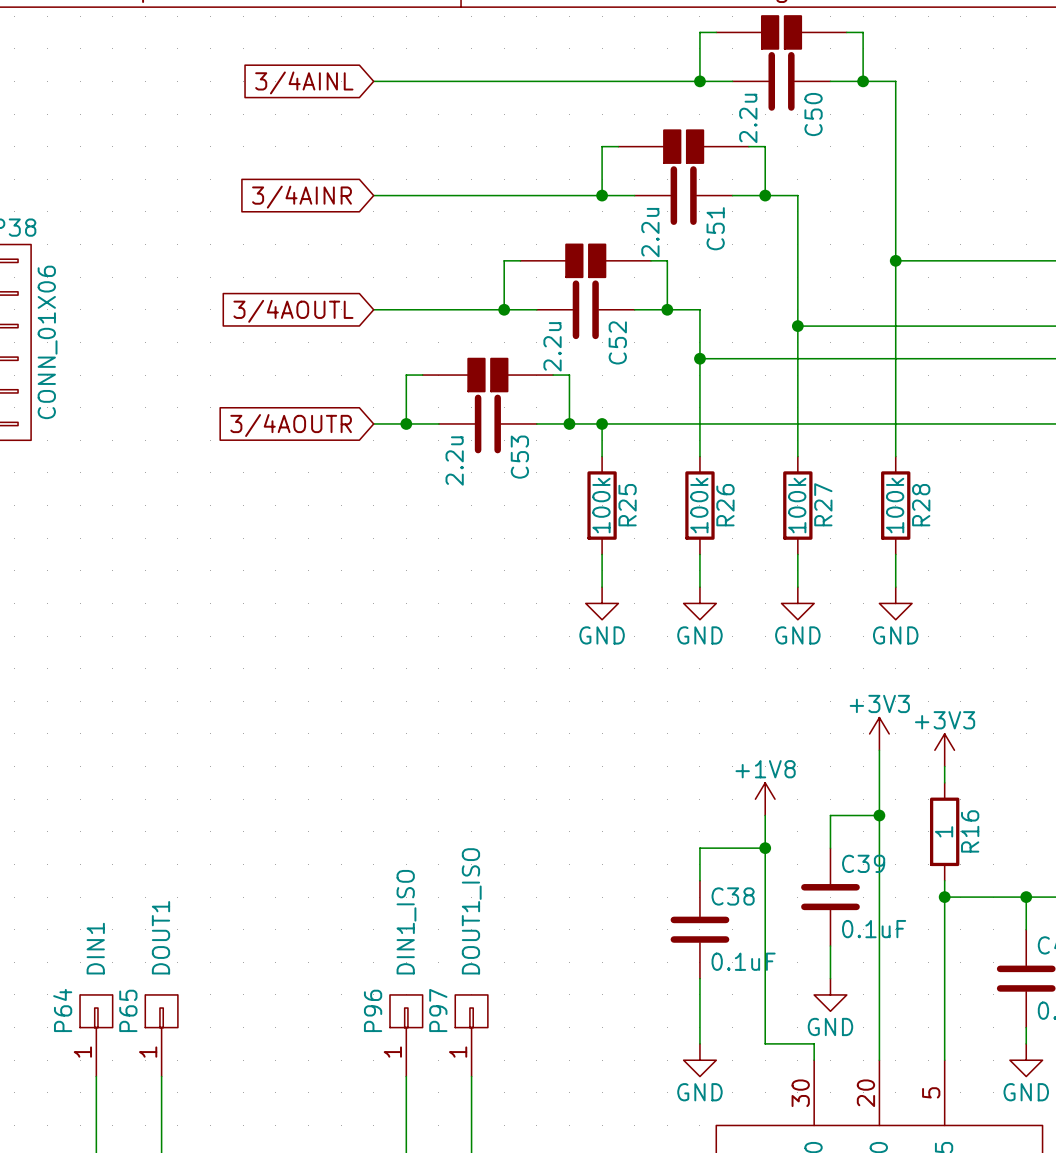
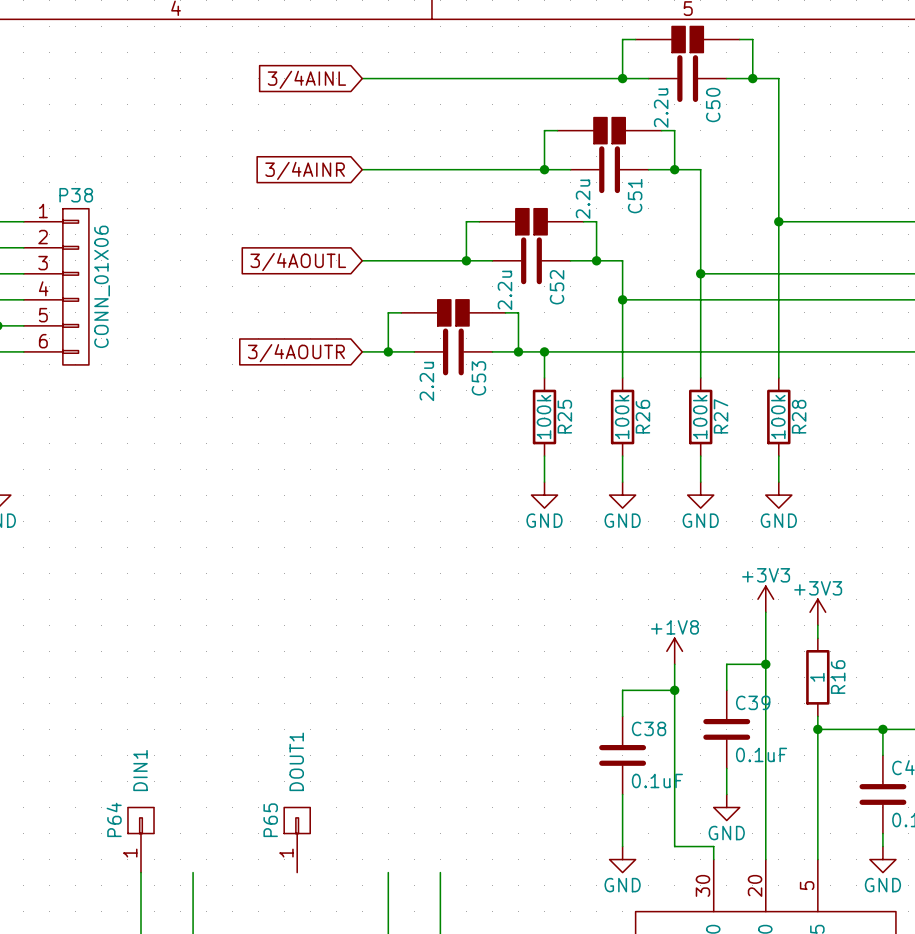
P65 position: (161, 1035) -> (297, 840)
P96: DIN1_ISO (406, 1035) -> none
P97: DOUT1_ISO (471, 1035) -> none

